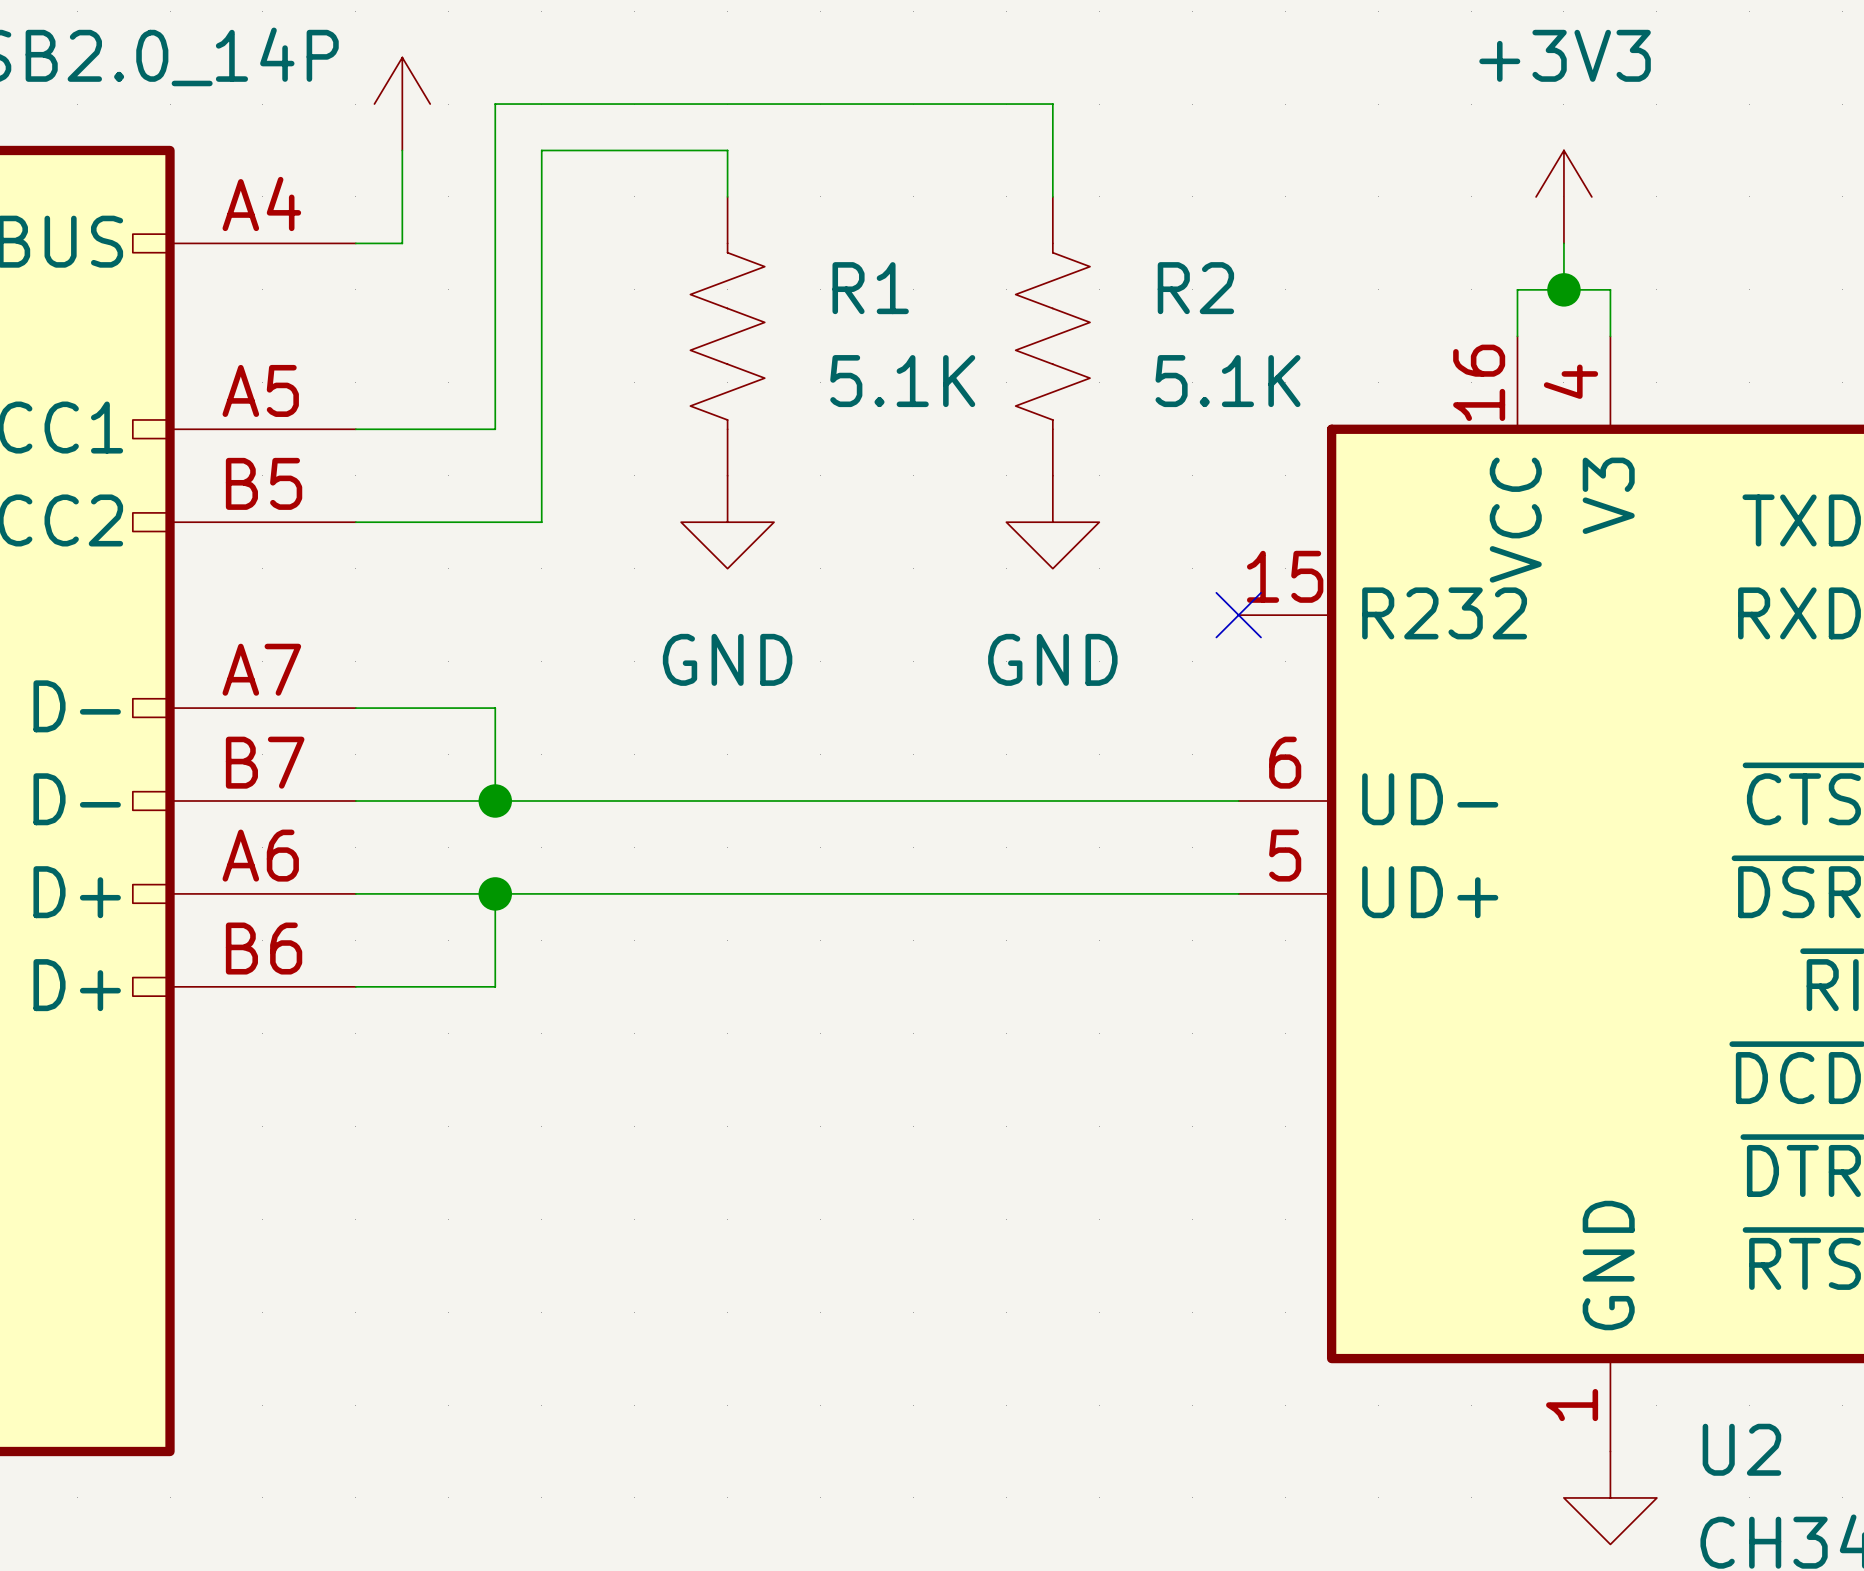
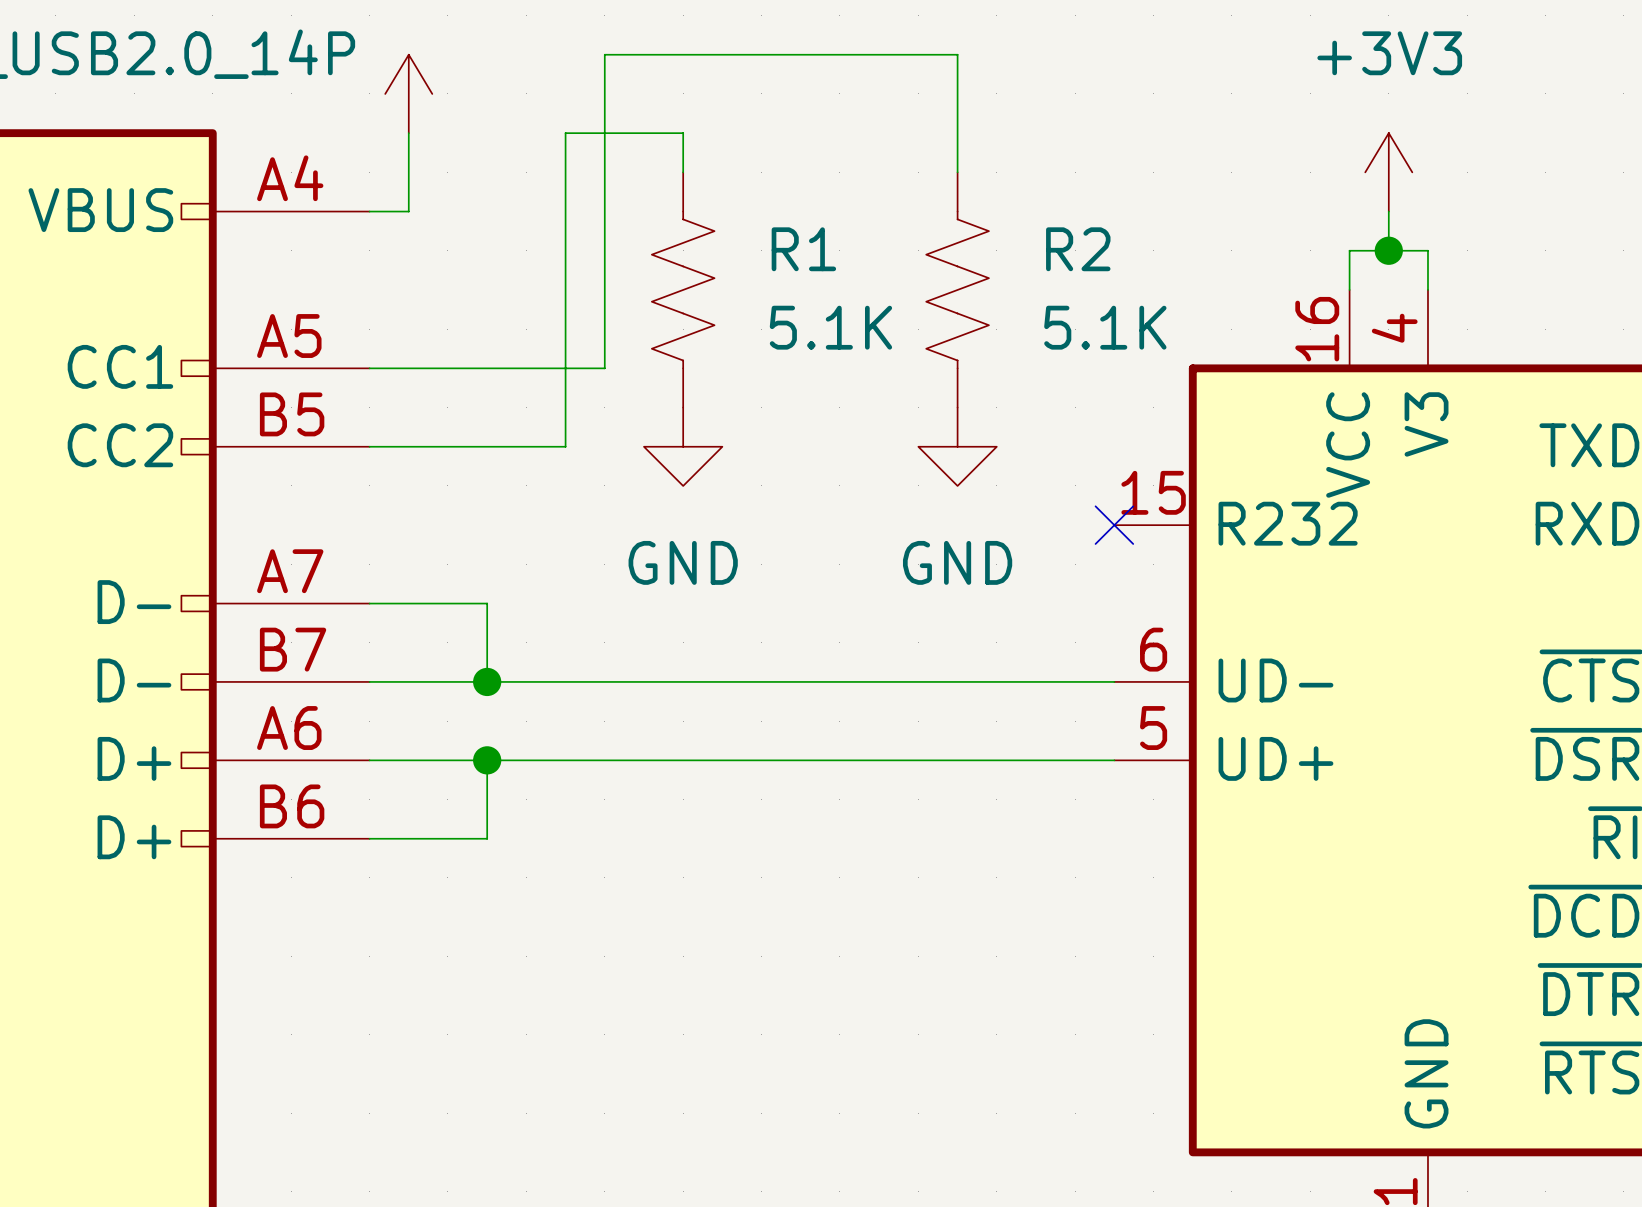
wire: (1052, 104) (495, 104) (495, 429) -> (957, 93) (957, 54) (604, 54) (604, 368) (487, 368)
wire: (588, 150) (541, 150) (541, 522) -> (565, 133) (565, 446) (526, 446)

